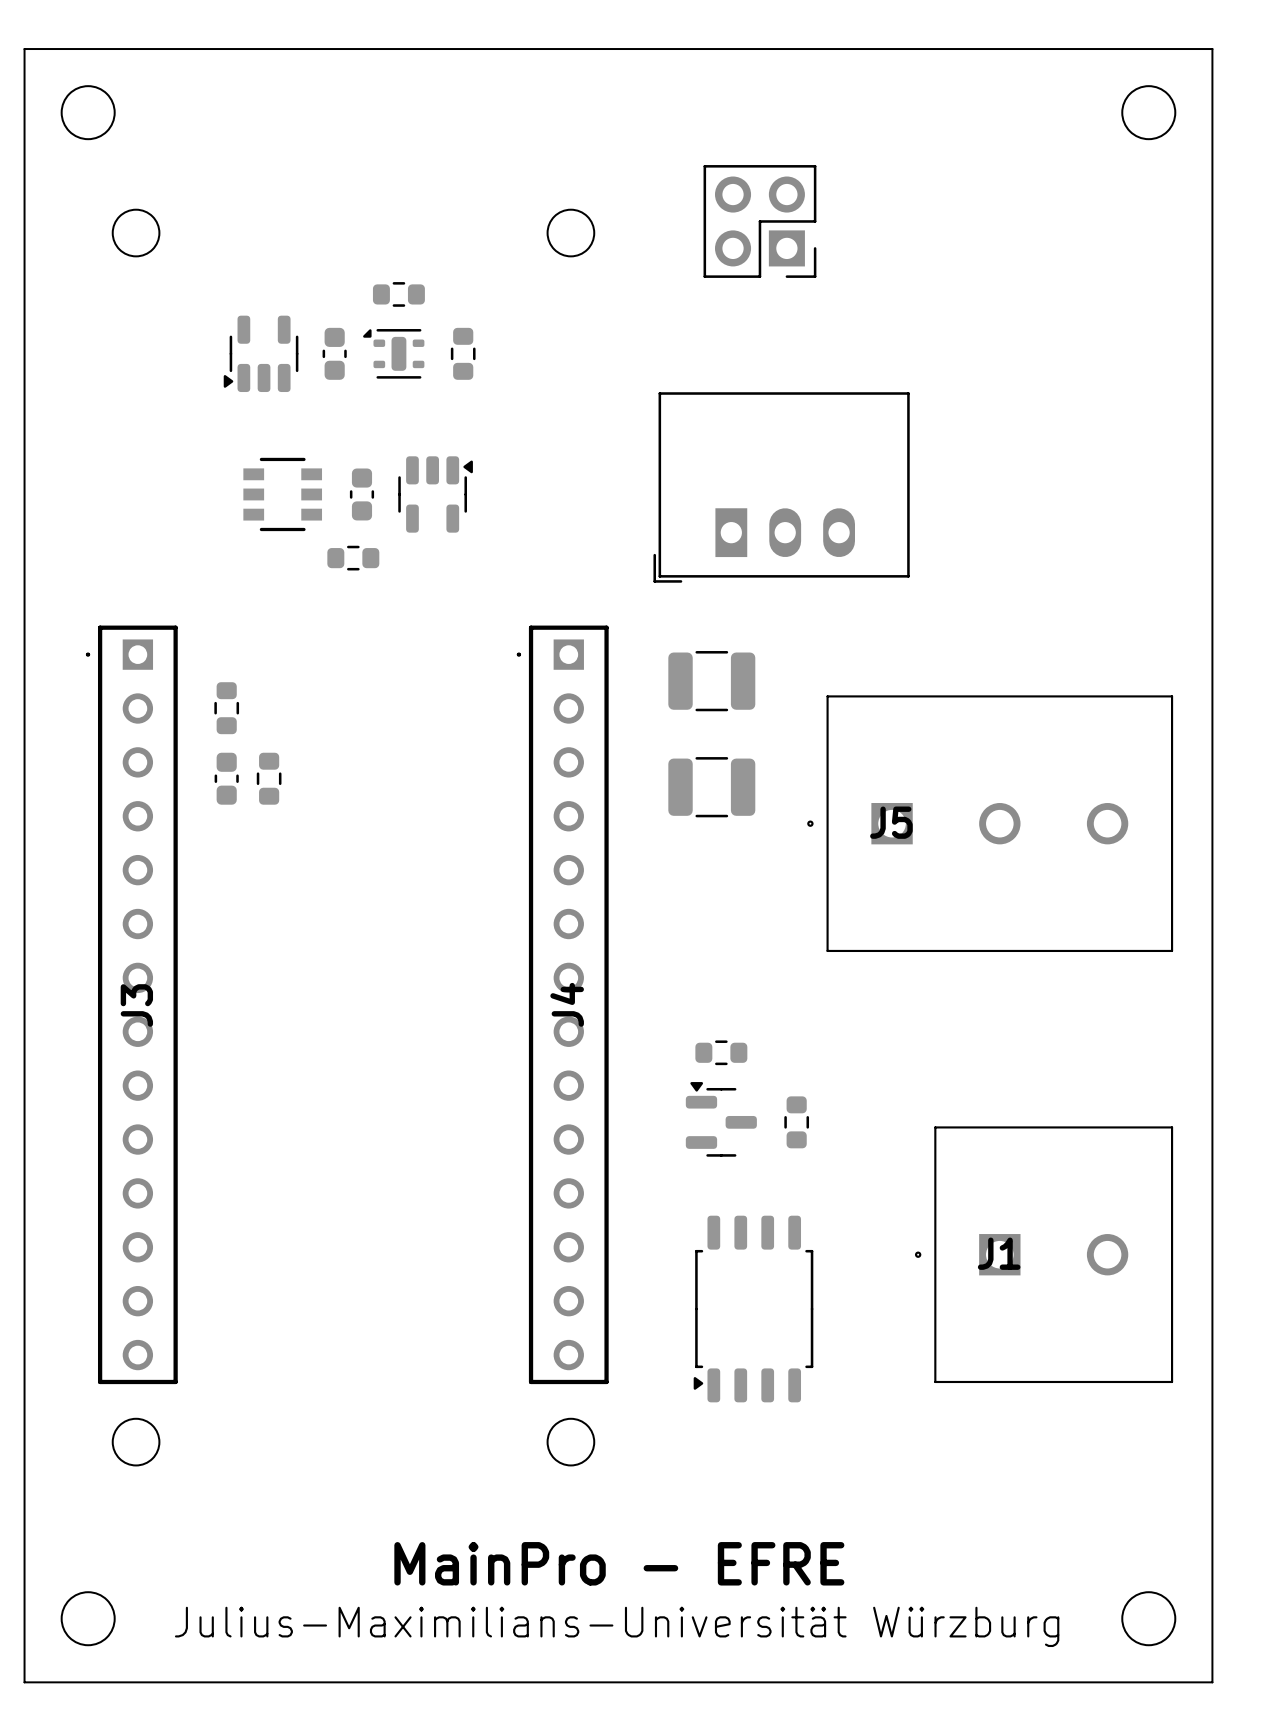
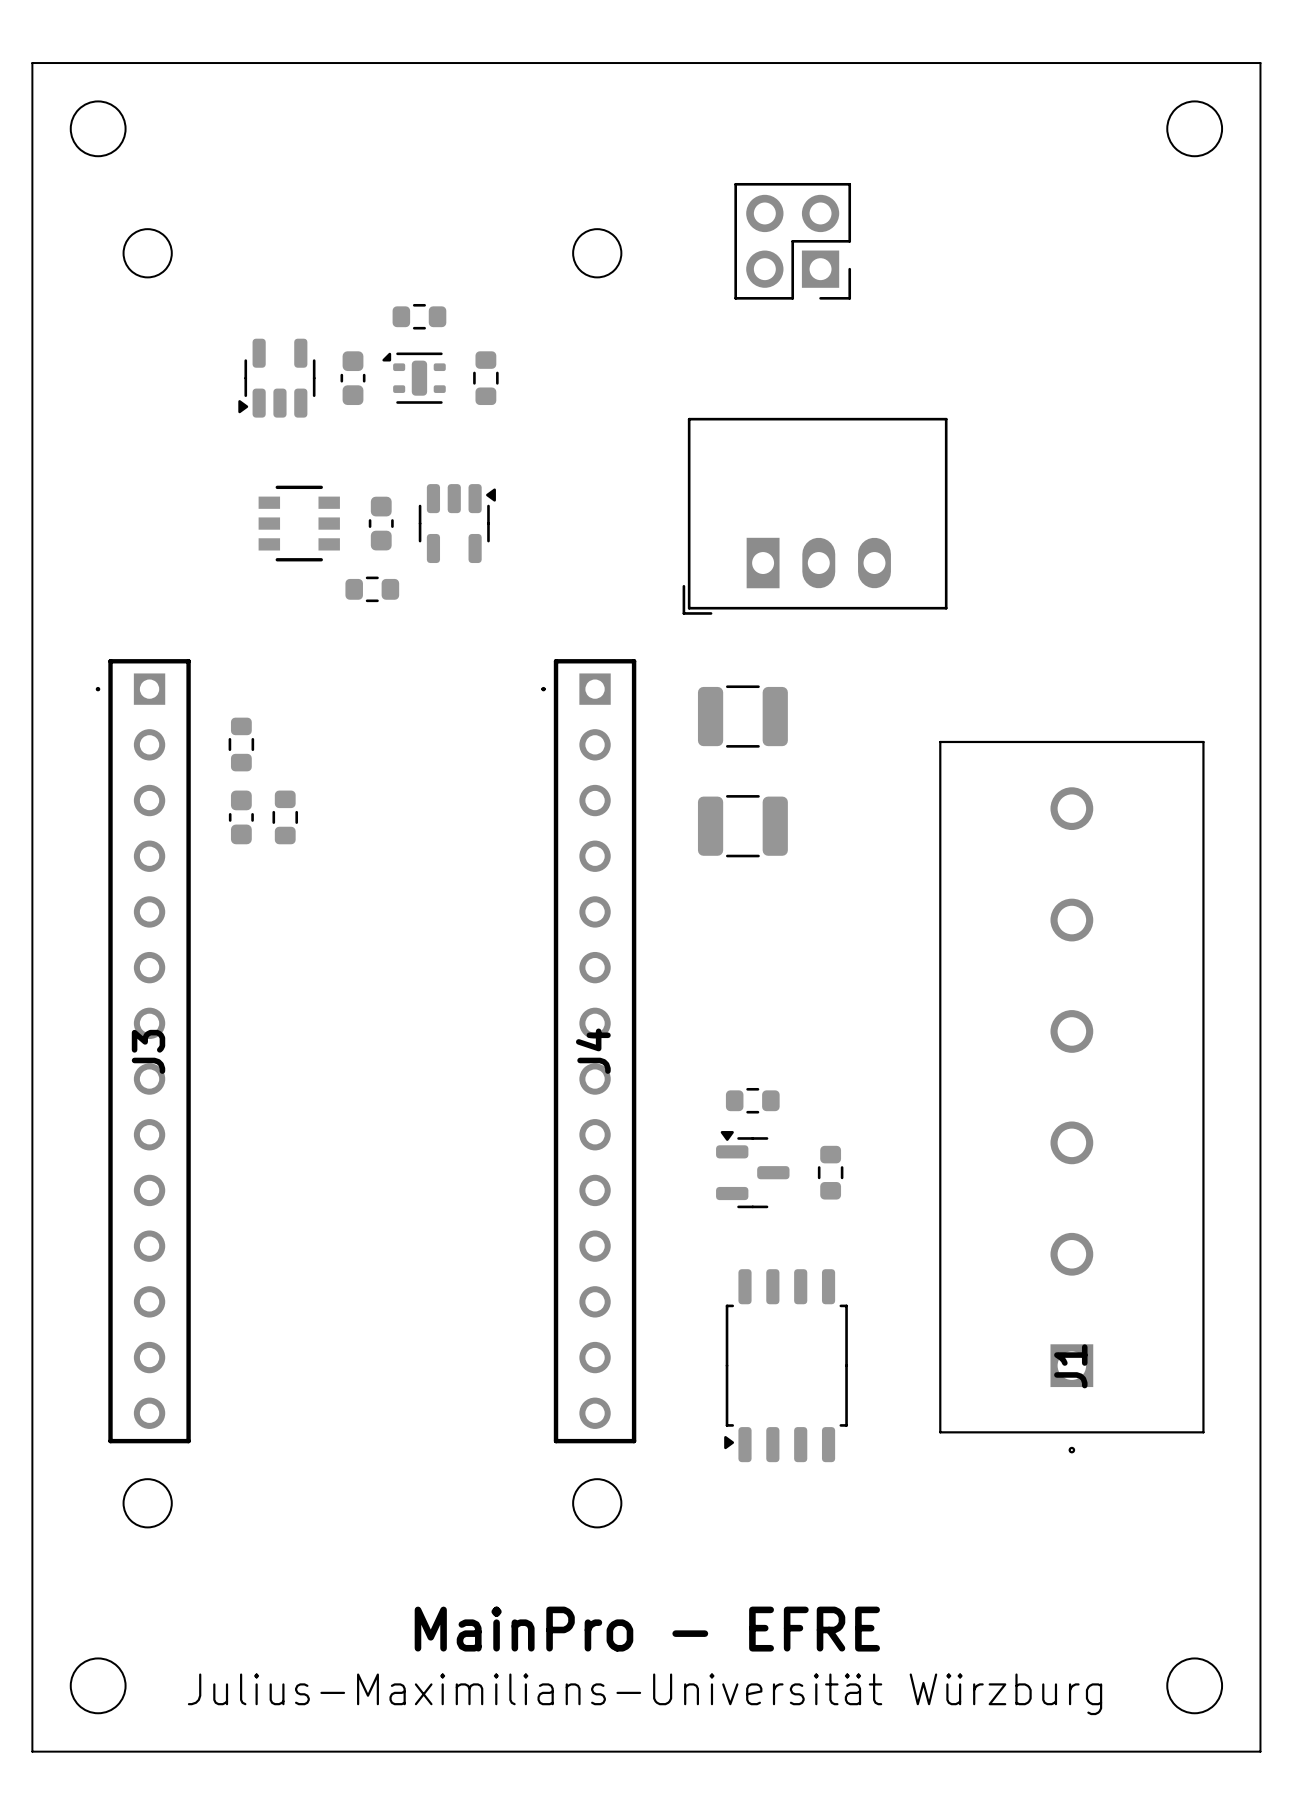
J5: (990, 823) -> none
J1 footprint: [914, 1126, 1174, 1384] -> [939, 740, 1205, 1454]
J1 name position: J1 (999, 1253) -> J1 (1070, 1366)

